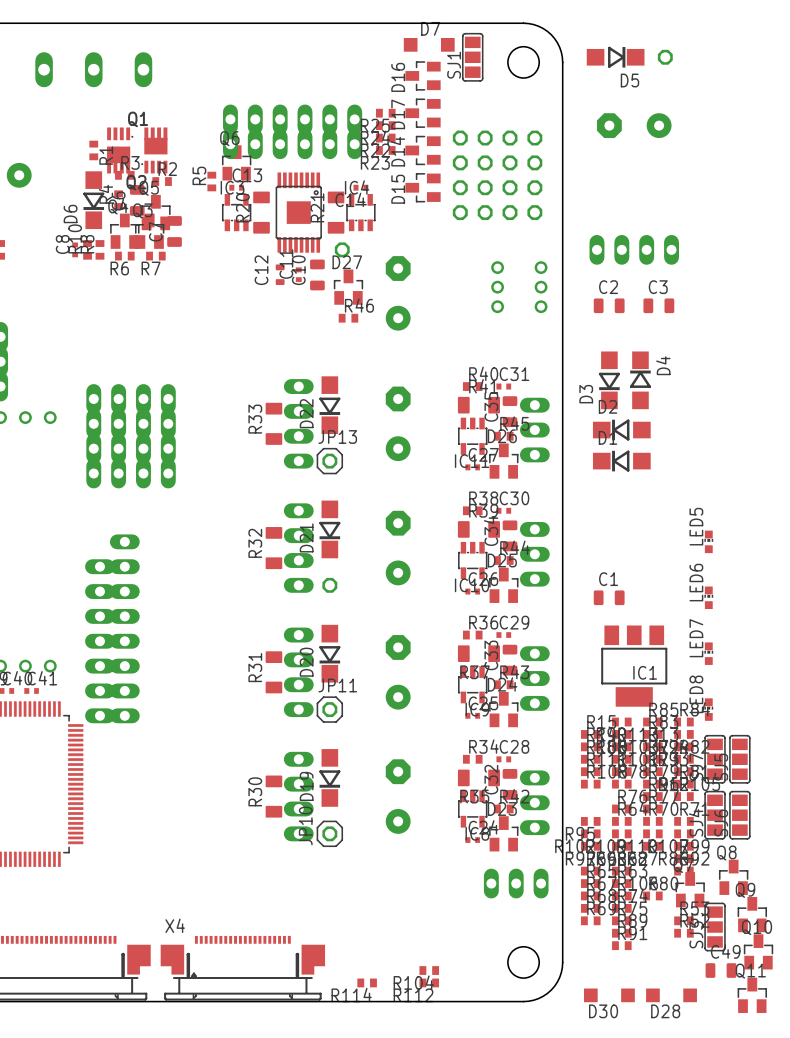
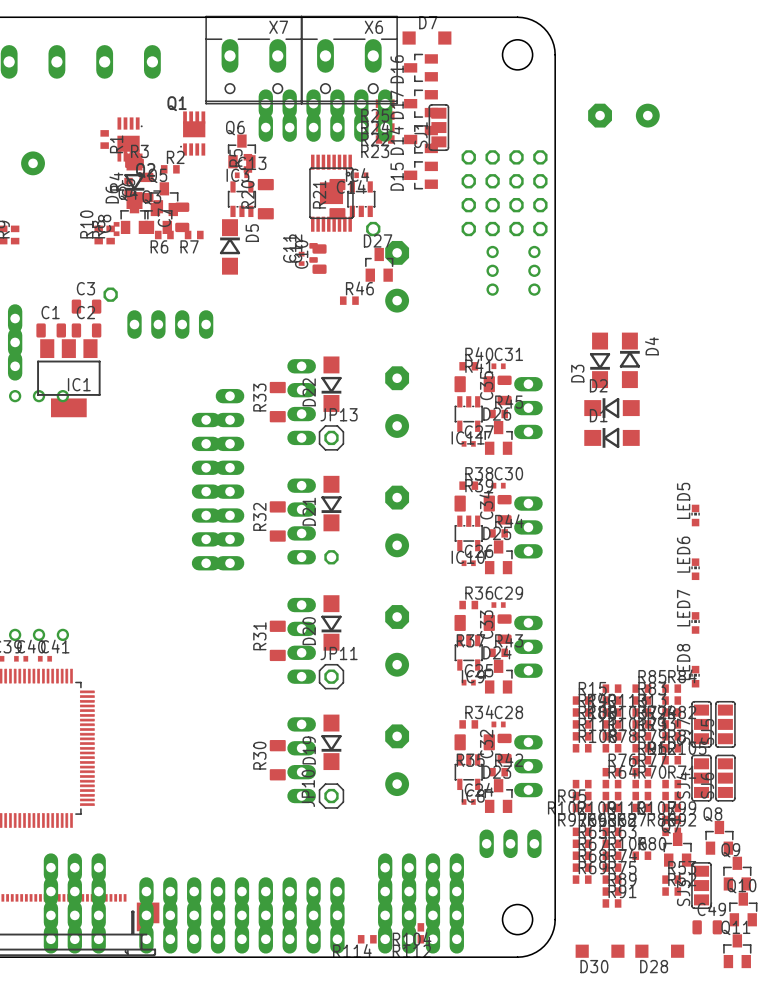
SJ1 position: (472, 57) -> (438, 127)
D5 rotation: 0° (615, 57) -> 90° counterclockwise (230, 246)
D5 position: (615, 57) -> (230, 246)
part: (665, 57) -> none
X7: none -> (253, 60)
X6: none -> (349, 60)
part: none -> (325, 103)
part: (292, 119) -> none
part: none -> (325, 127)
part: (292, 144) -> none
Q1 position: (154, 150) -> (192, 133)
part: (472, 175) -> none
part rotation: 0° (522, 175) -> 90° clockwise (504, 169)
R5 position: (211, 181) -> (247, 163)
D6 position: (93, 200) -> (134, 181)
part position: (298, 212) -> (331, 193)
part: none -> (504, 217)
C8 position: (75, 249) -> (116, 229)
part position: (342, 249) -> (373, 229)
part: (634, 249) -> none
R6 position: (124, 256) -> (164, 234)
R7 position: (155, 256) -> (194, 234)
C12 position: (280, 274) -> (313, 252)
D27 position: (348, 287) -> (379, 264)
C2 position: (609, 305) -> (86, 330)
C3 position: (658, 305) -> (86, 306)
part: none -> (110, 294)
part: none -> (170, 324)
part: (131, 398) -> none
part: (131, 423) -> none
part: (131, 448) -> none
part: (131, 473) -> none
part: none -> (206, 455)
part: none -> (206, 539)
C1 position: (609, 597) -> (51, 330)
part: (99, 603) -> none
part position: (124, 603) -> (230, 455)
IC1 position: (634, 666) -> (68, 378)
part: (99, 690) -> none
part position: (124, 703) -> (230, 551)
part: none -> (74, 867)
part: none -> (421, 867)
part: none -> (74, 891)
part: none -> (206, 891)
part: none -> (313, 891)
part: none -> (421, 891)
part: none -> (74, 915)
part: none -> (206, 915)
part: none -> (313, 915)
part: none -> (421, 915)
X4: (242, 968) -> none
part: none -> (74, 939)
part: none -> (206, 939)
part: none -> (313, 939)
part: none -> (421, 939)

